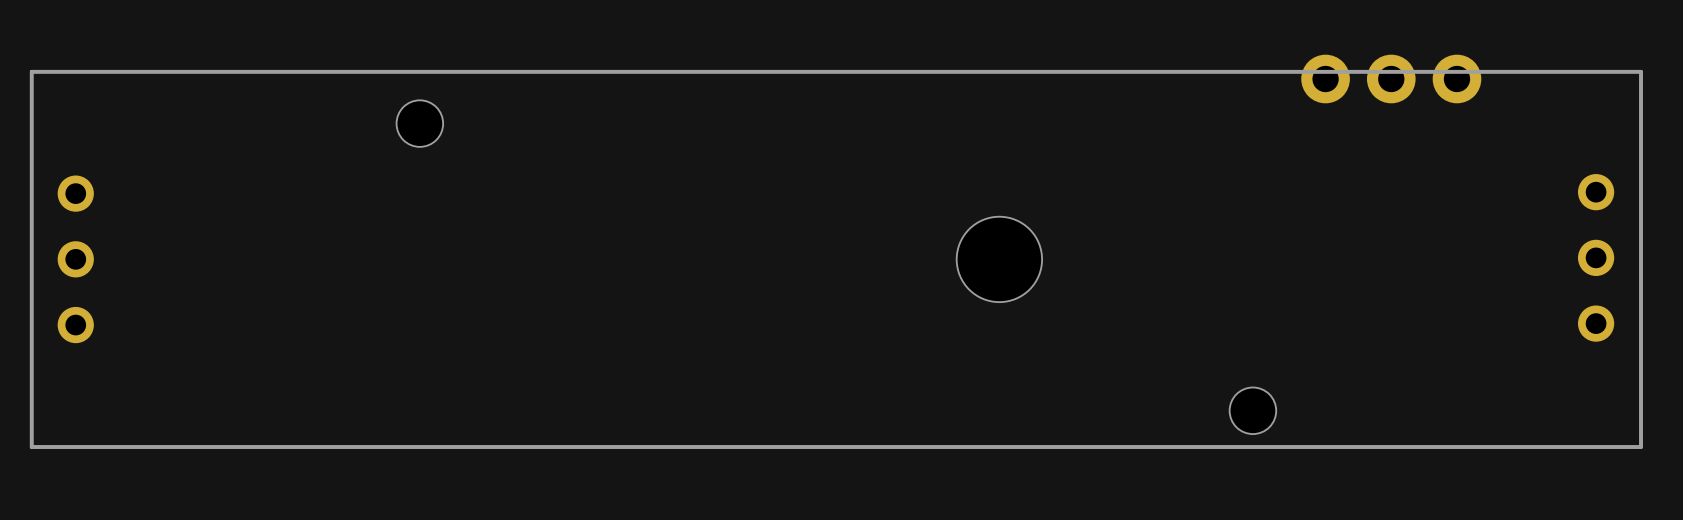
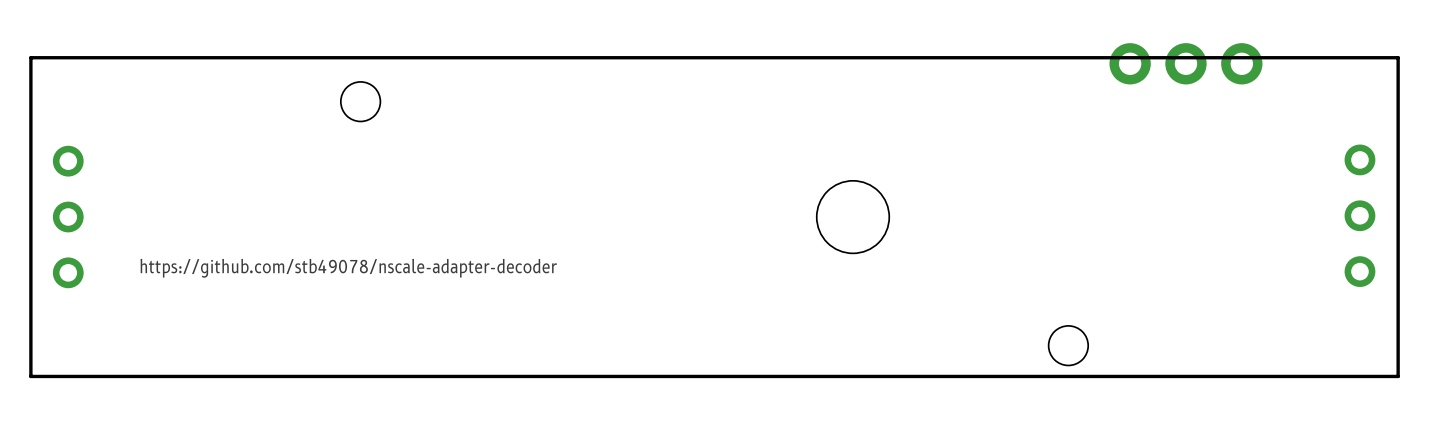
text: none -> https://github.com/stb49078/nscale-adapter-decoder (348, 268)

